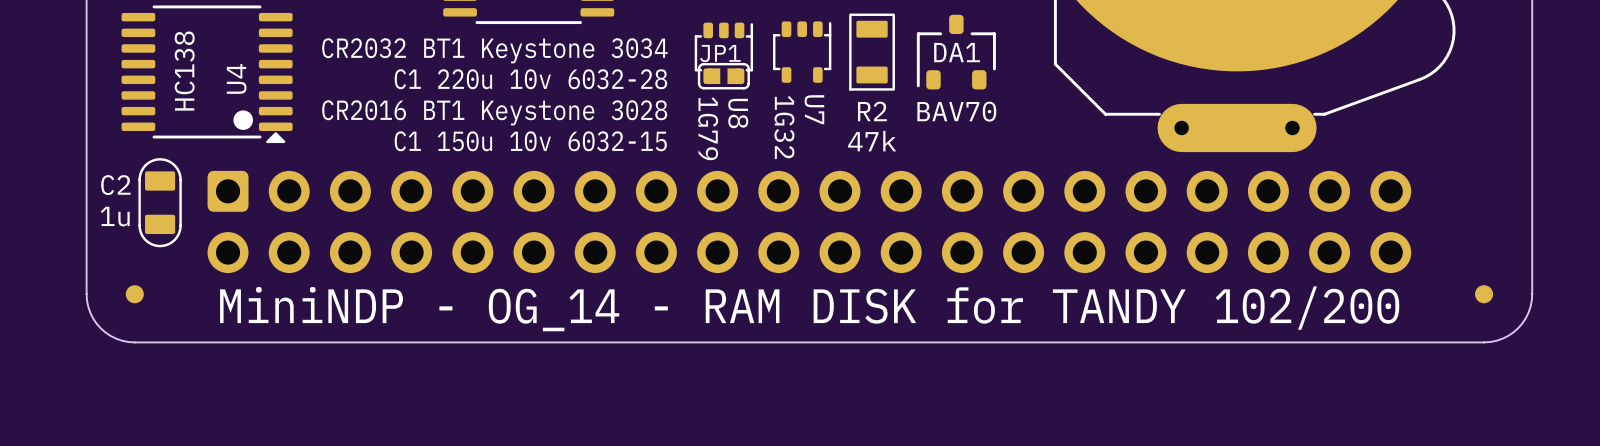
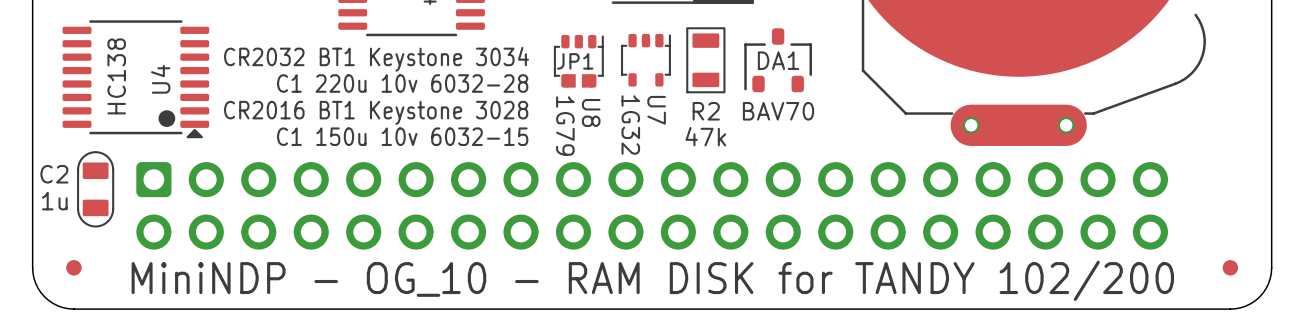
line: (743, 64) (702, 64) (699, 68) (699, 85) (703, 88) (745, 87) (748, 83) (748, 68) (743, 64) -> none
text: MiniNDP - OG_14 - RAM DISK for TANDY 102/200 (809, 308) -> MiniNDP - OG_10 - RAM DISK for TANDY 102/200 (652, 280)

